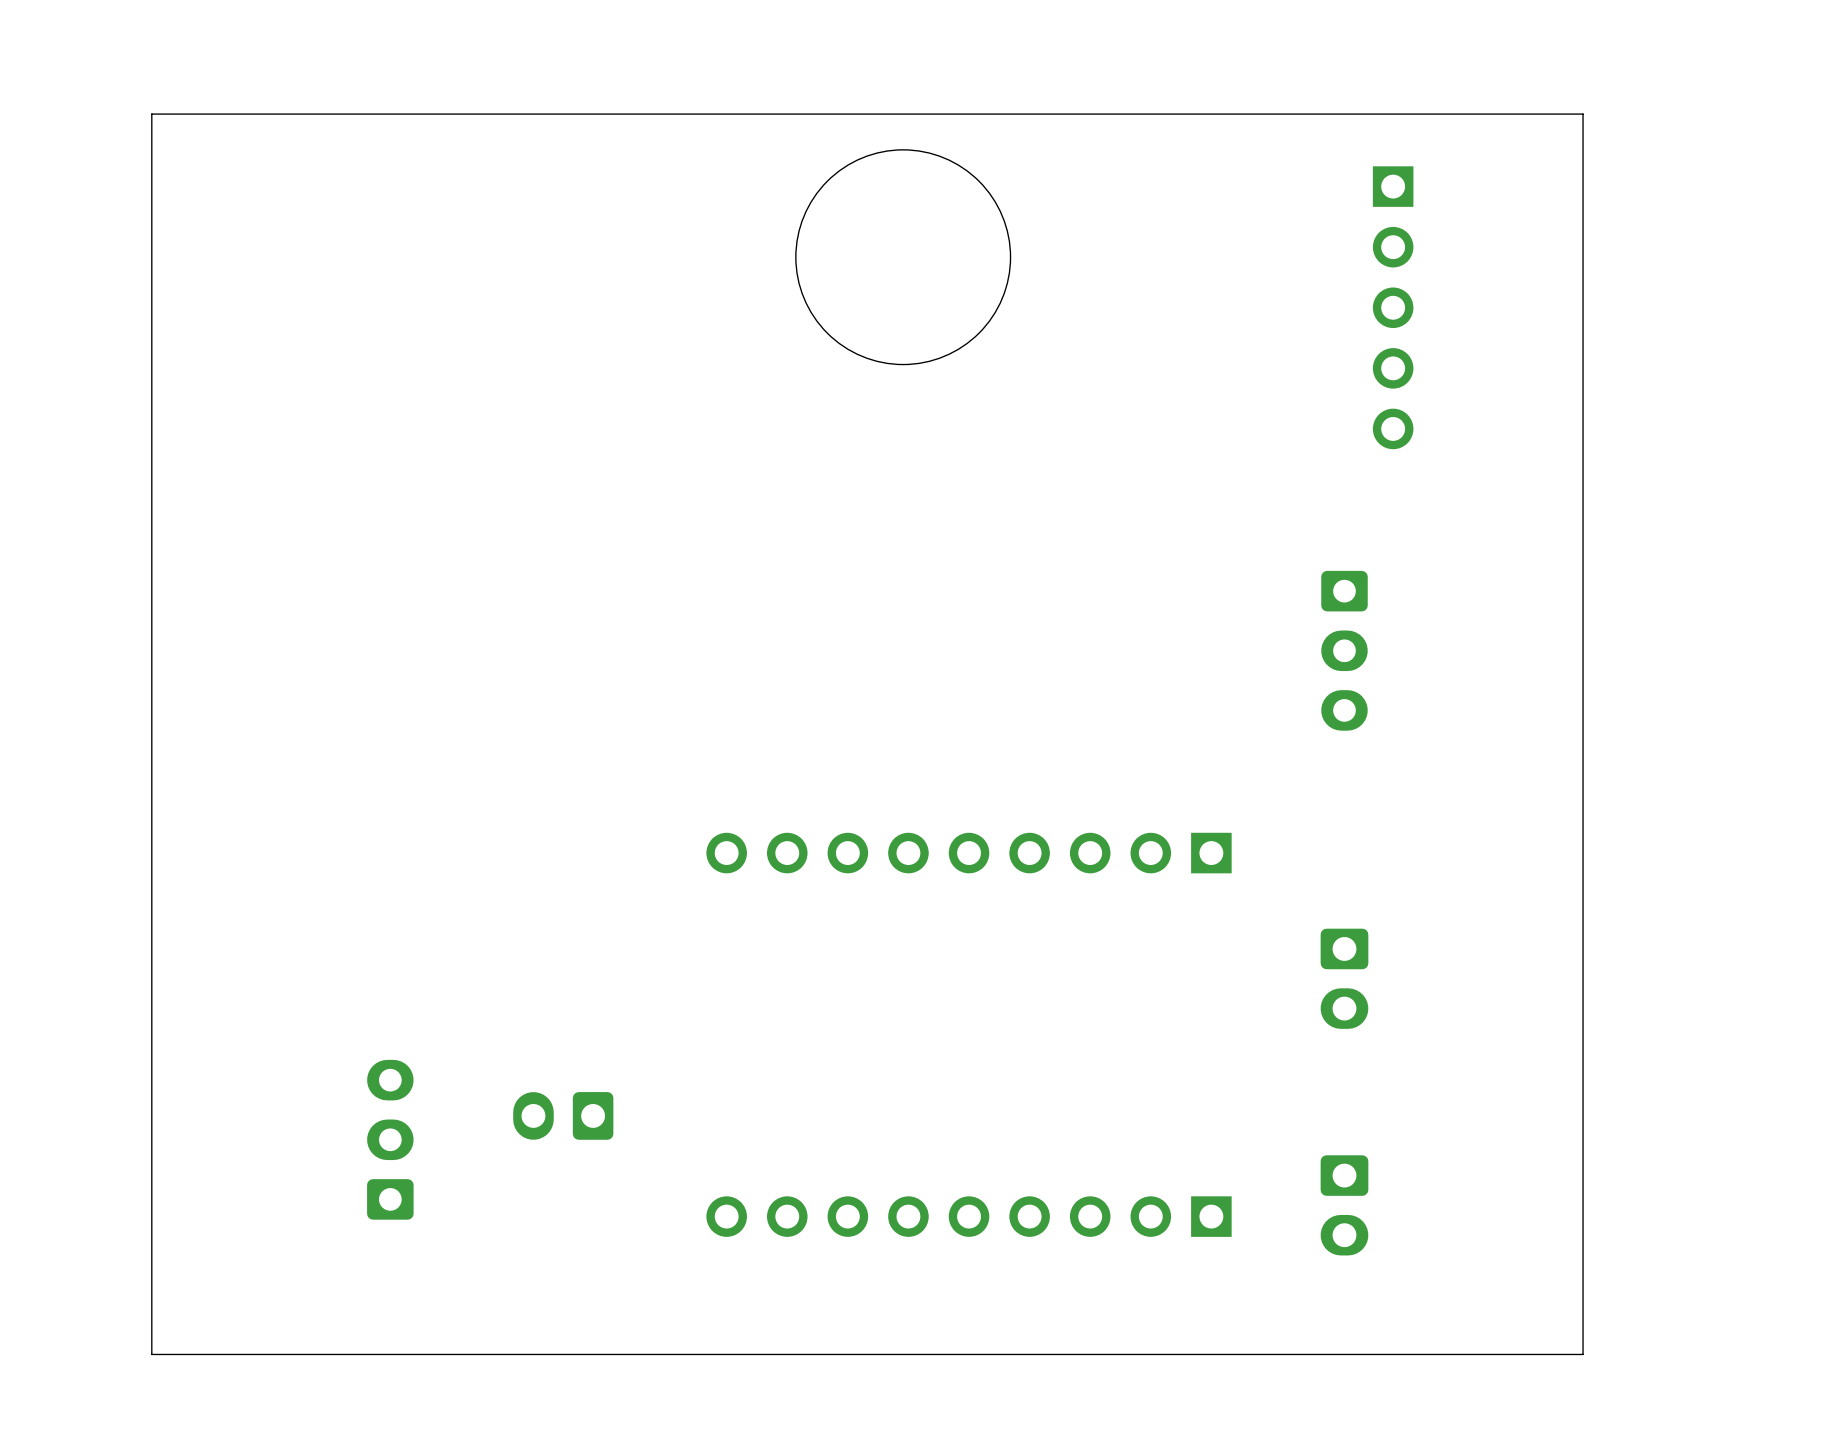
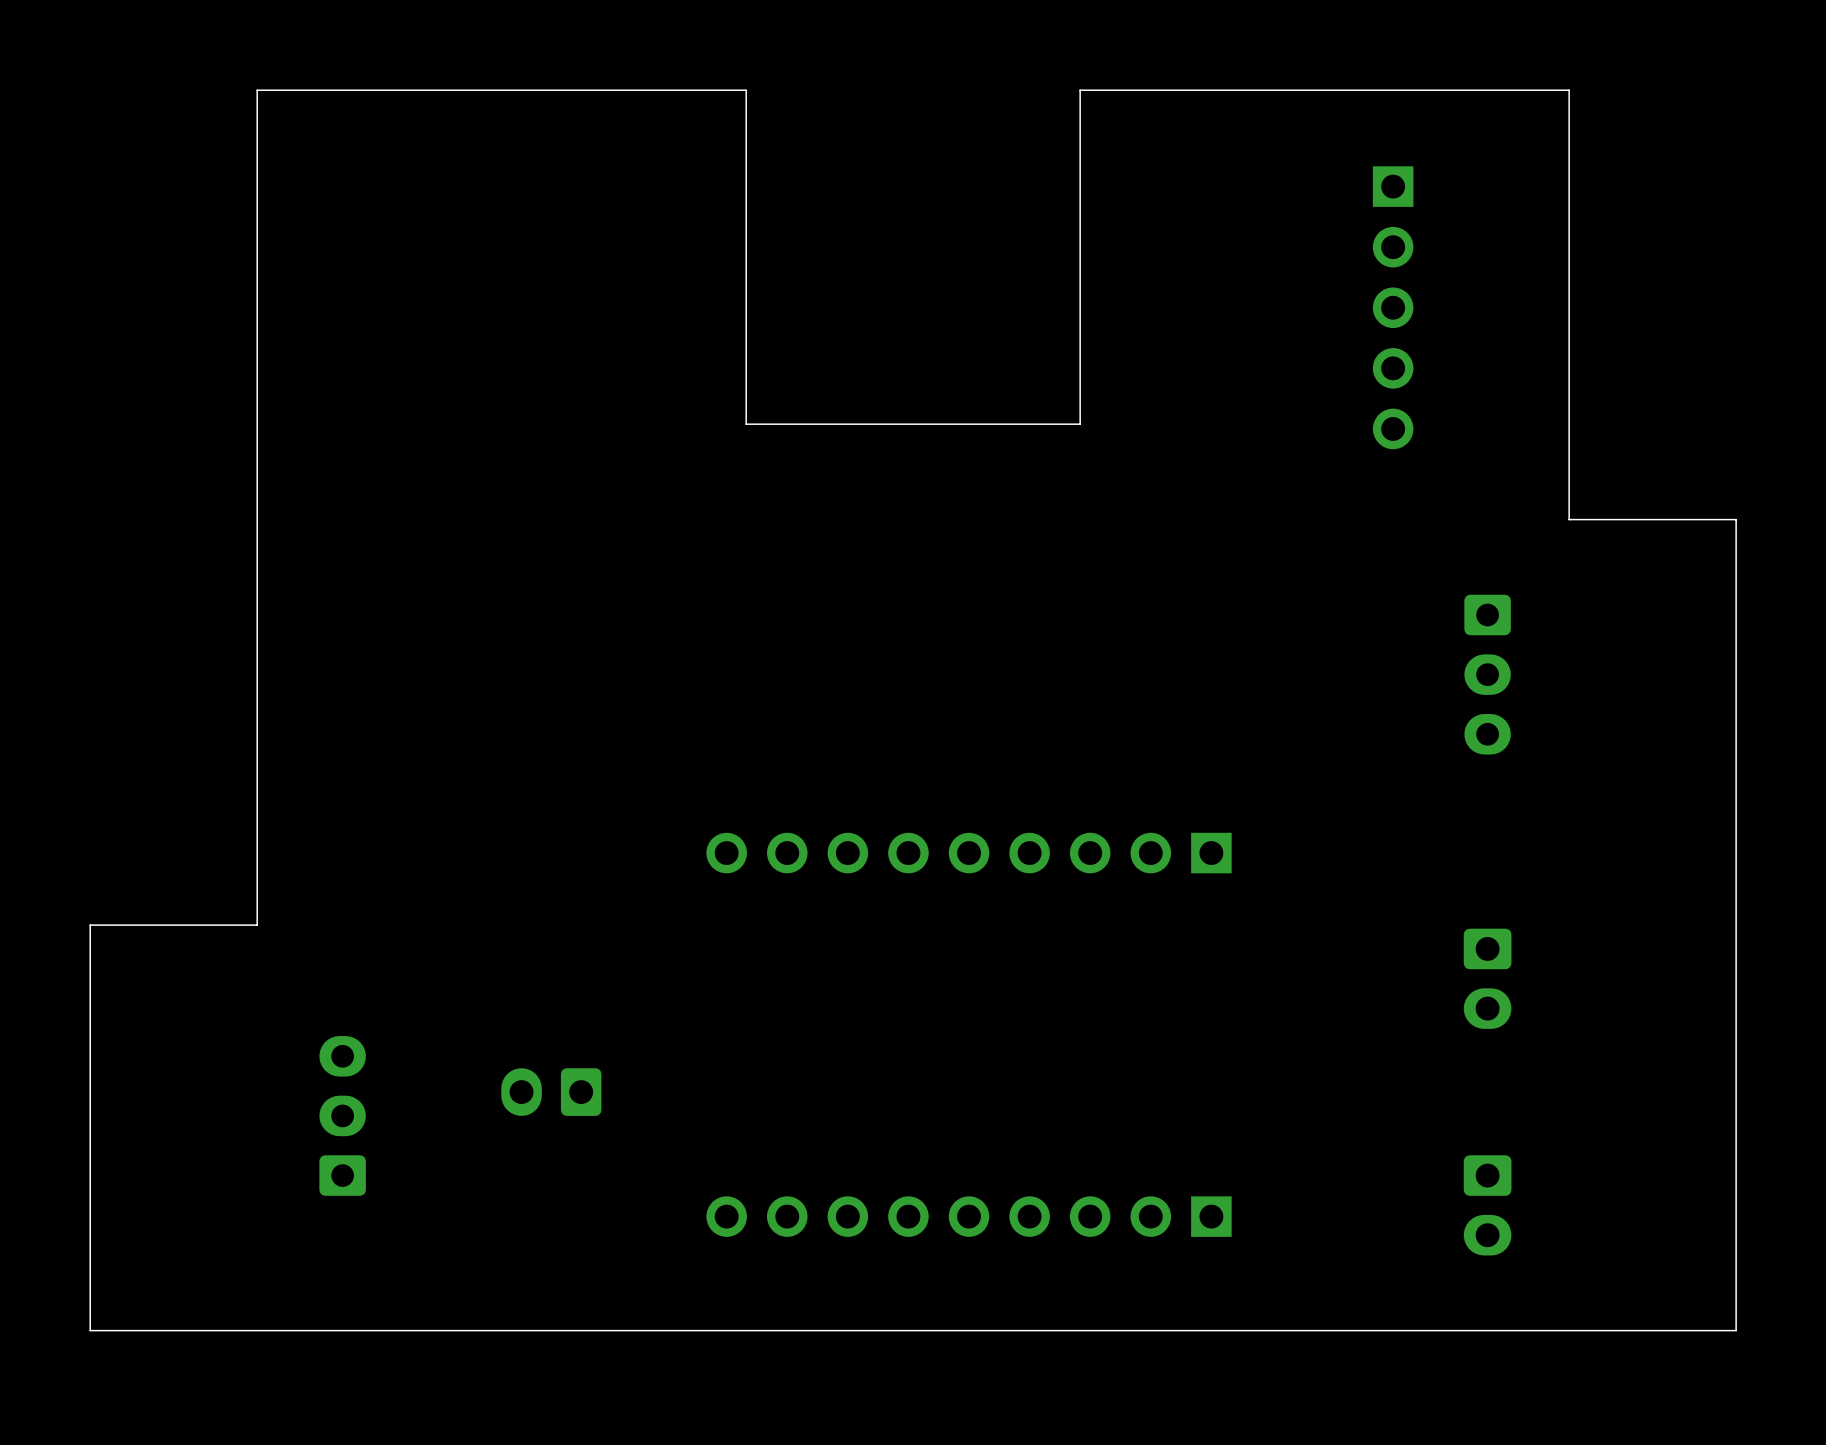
board edge: (1583, 114) (151, 114) (151, 1354) (1583, 1354) (1583, 114) -> (1569, 90) (1569, 519) (1736, 519) (1736, 1330) (90, 1330) (90, 925) (257, 925) (257, 90) (746, 90) (746, 424) (1080, 424) (1080, 90) (1569, 90)
round board edge: [795, 149, 1012, 366] -> none
part position: (1344, 650) -> (1487, 674)
part: (1344, 978) -> none
part: none -> (1487, 978)
part position: (563, 1115) -> (551, 1092)
part position: (390, 1139) -> (342, 1115)
part: (1344, 1205) -> none
part: none -> (1487, 1205)

